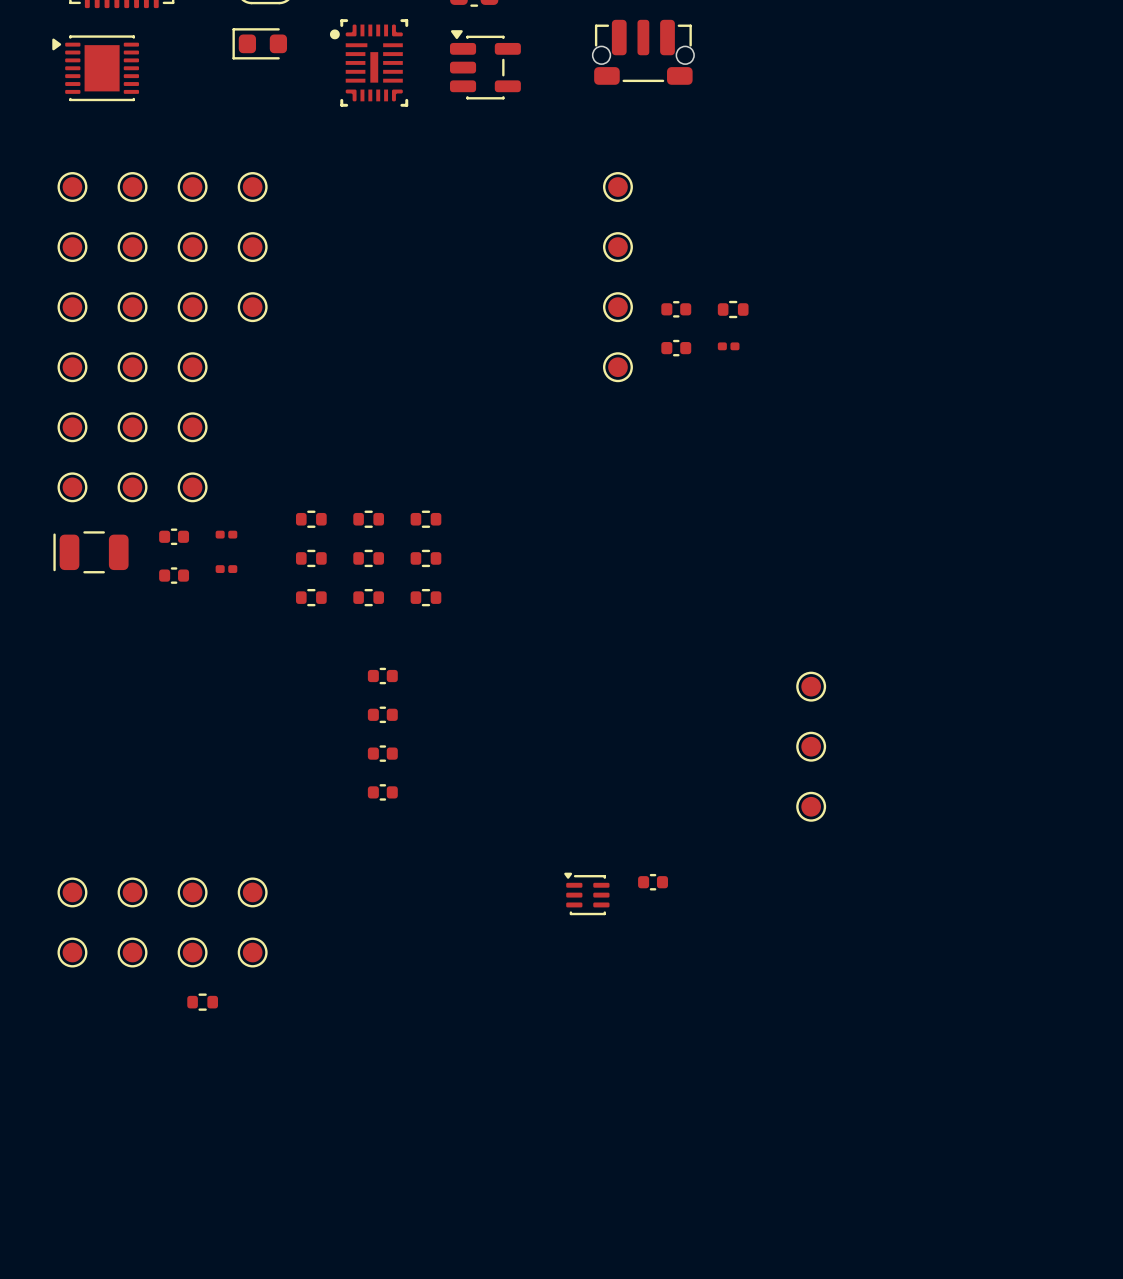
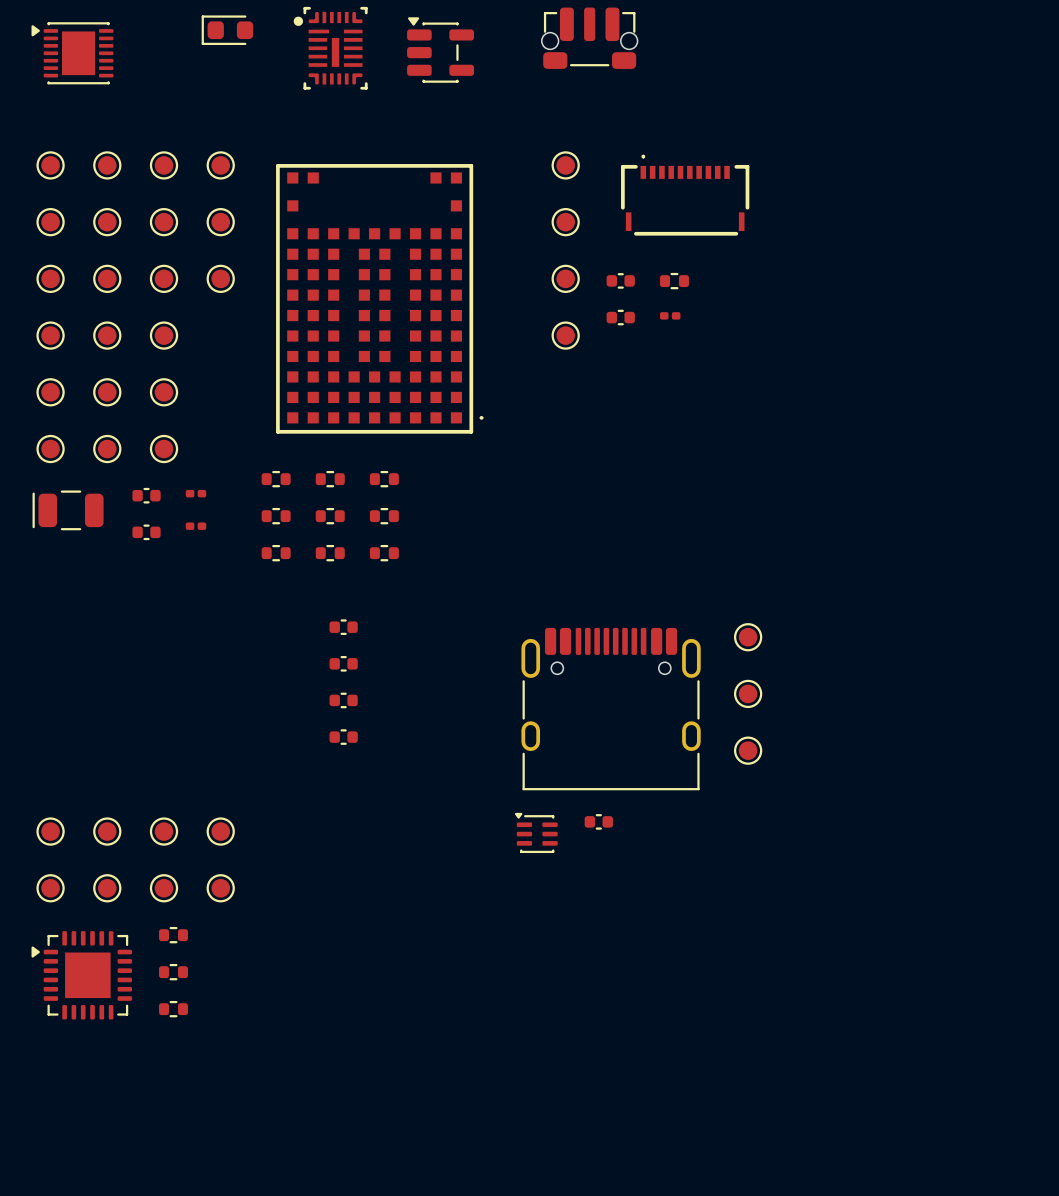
part: none -> (685, 195)
part: none -> (379, 298)
part: none -> (611, 709)
part: none -> (173, 972)
part: none -> (81, 975)
part: none -> (173, 1009)

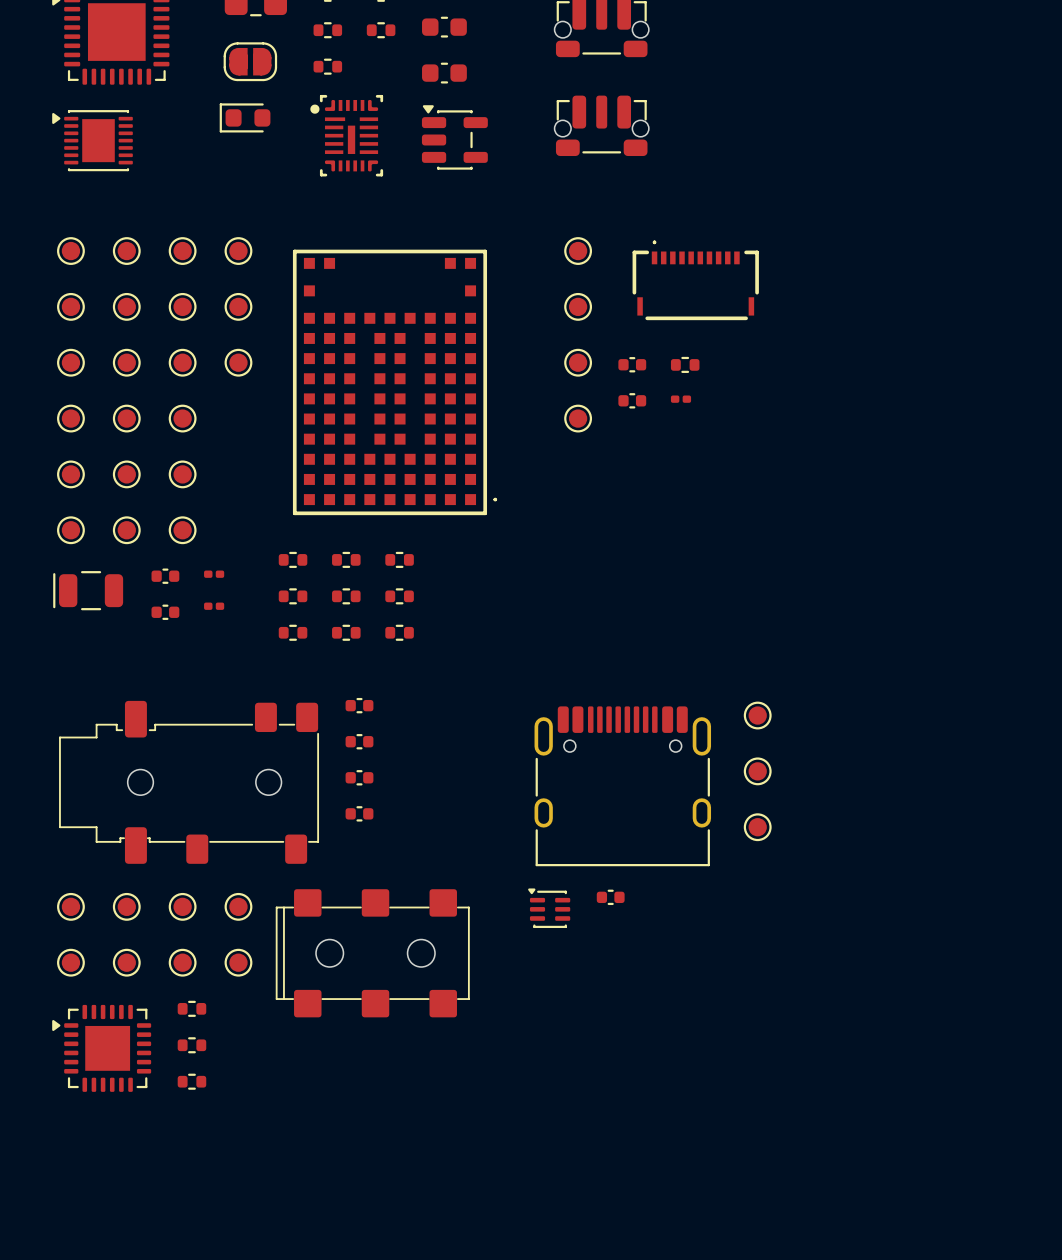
part: none -> (189, 782)
part: none -> (372, 953)

